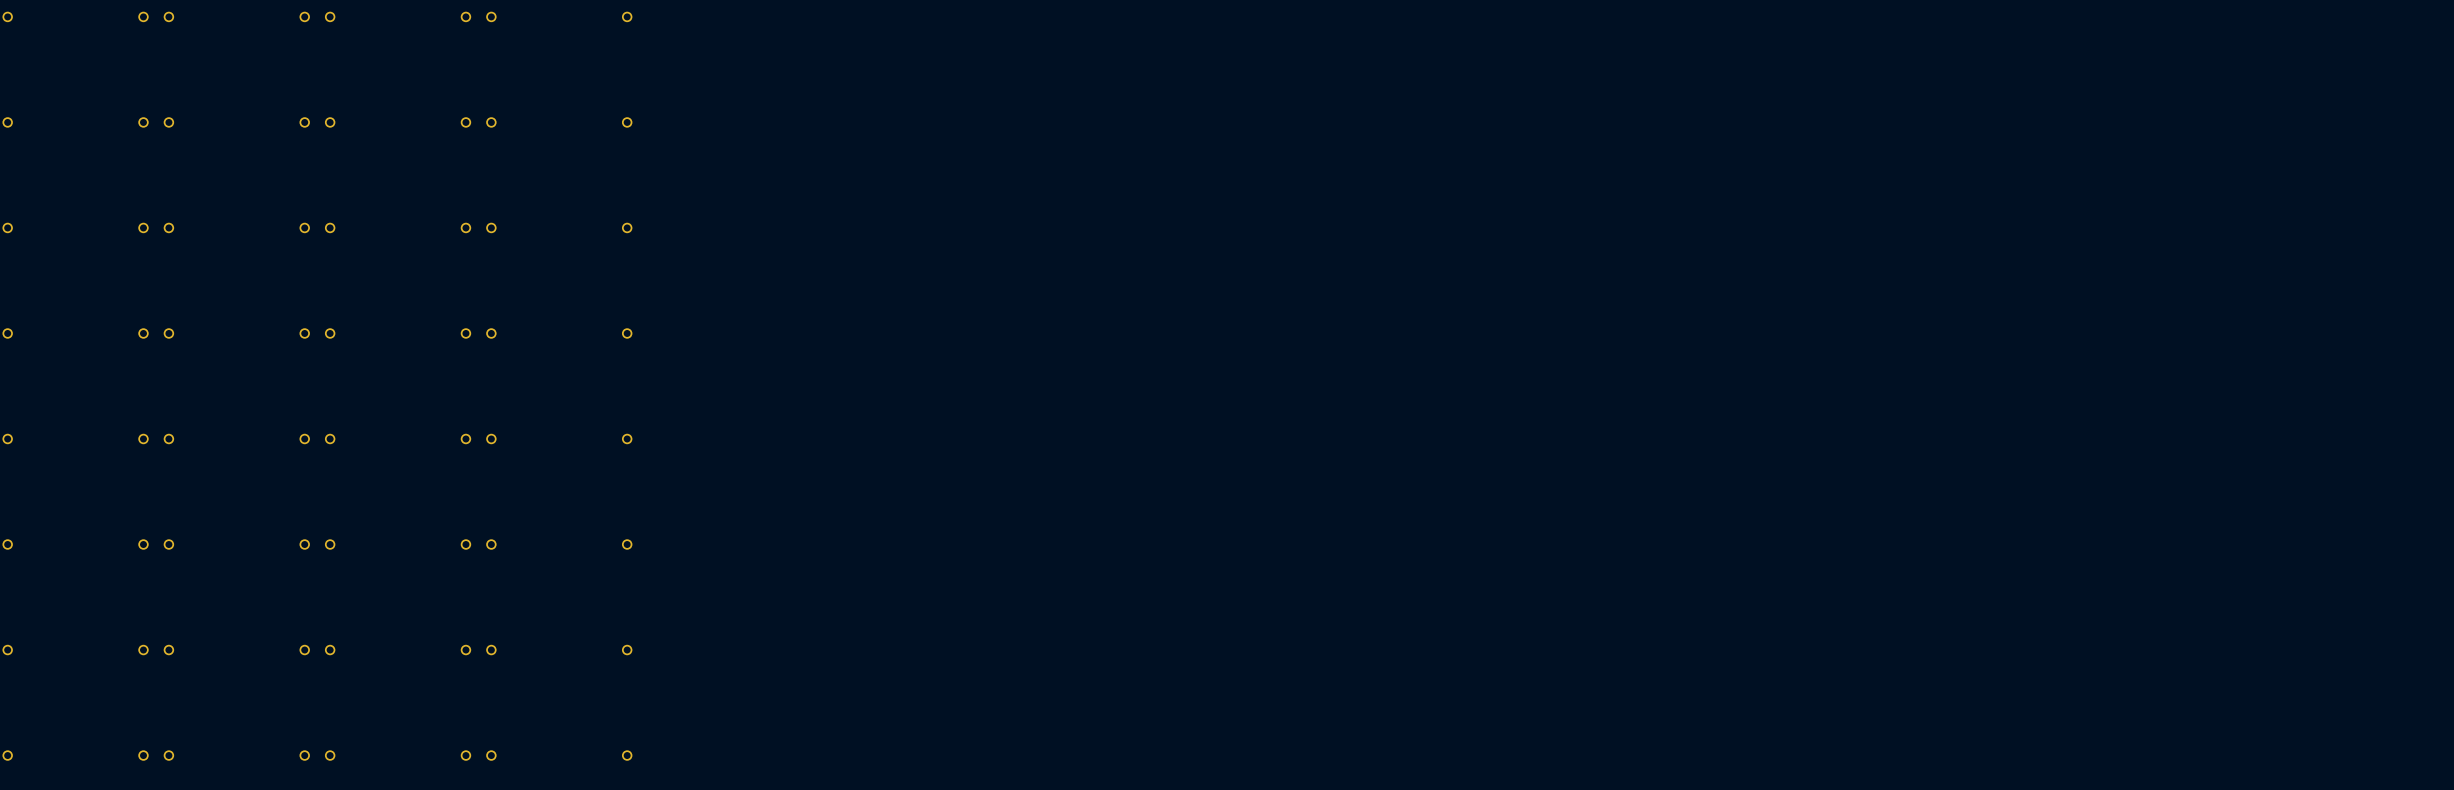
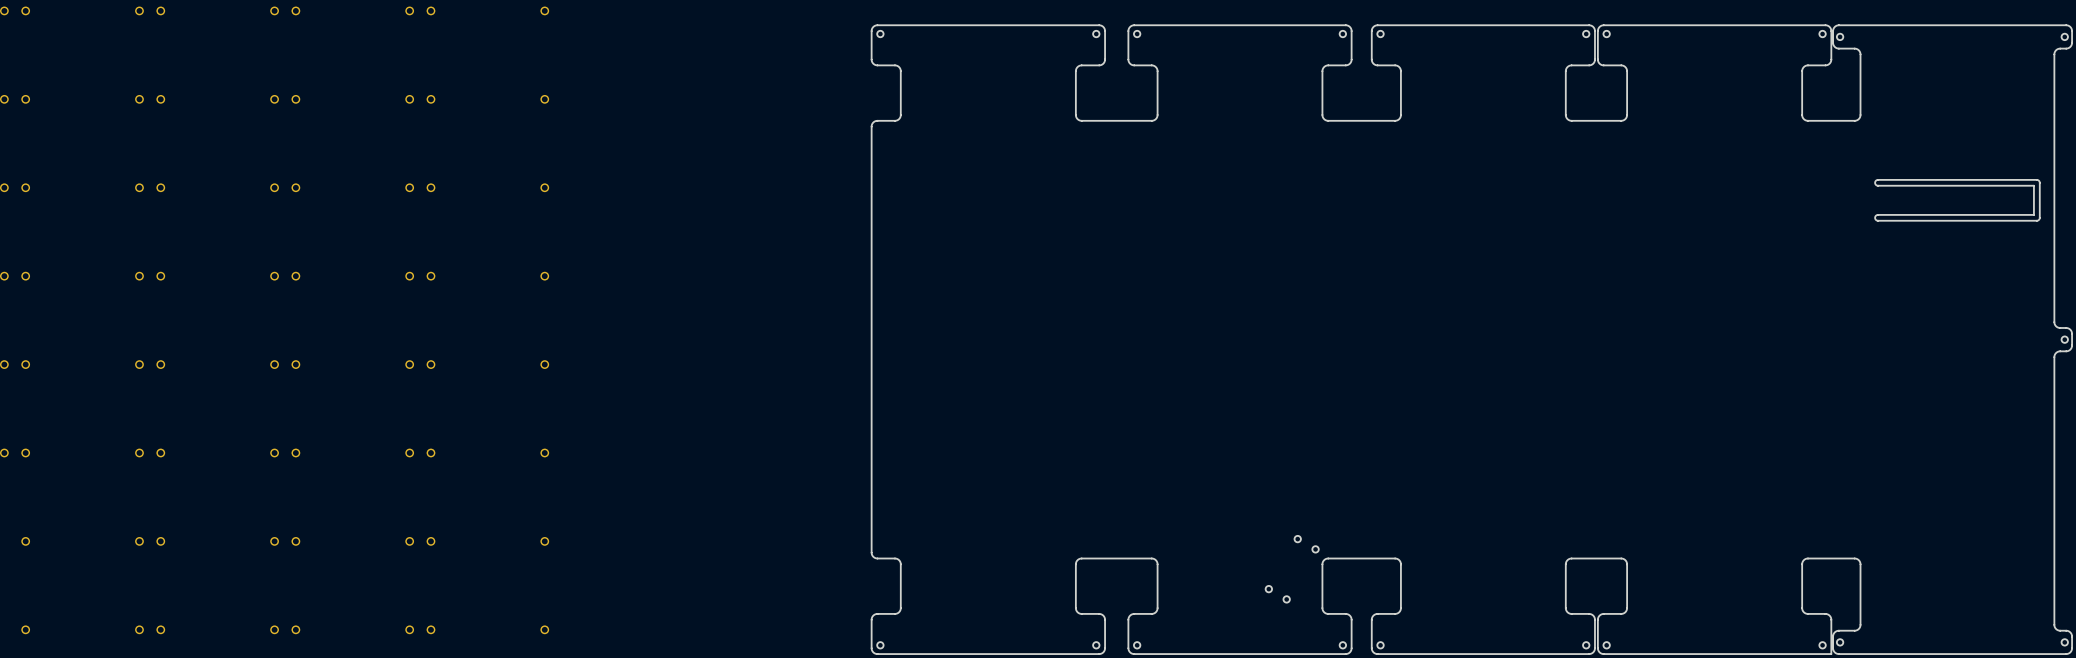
board edge: none -> (2066, 25) (1836, 25) (1833, 30) (1834, 46) (1855, 48) (1860, 53) (1860, 115) (1854, 120) (1807, 120) (1802, 116) (1802, 68) (1807, 65) (1827, 65) (1831, 61) (1831, 30) (1826, 25) (1601, 25) (1597, 30) (1598, 62) (1602, 65) (1622, 65) (1626, 69) (1627, 115) (1621, 120) (1570, 120) (1566, 116) (1566, 68) (1570, 65) (1590, 65) (1594, 61) (1594, 30) (1589, 25) (1375, 25) (1371, 30) (1372, 62) (1376, 65) (1396, 65) (1400, 69) (1400, 115) (1395, 120) (1328, 120) (1323, 117) (1323, 68) (1327, 65) (1347, 65) (1351, 61) (1351, 30) (1347, 25) (1131, 25) (1128, 30) (1129, 62) (1133, 65) (1153, 65) (1157, 69) (1157, 115) (1151, 120) (1081, 120) (1076, 117) (1076, 69) (1080, 65) (1099, 65) (1104, 62) (1105, 30) (1101, 25) (874, 25) (871, 30) (871, 61) (875, 65) (895, 65) (900, 68) (900, 114) (897, 120) (876, 120) (871, 126) (871, 552) (875, 558) (895, 558) (900, 561) (900, 608) (896, 613) (876, 613) (872, 616) (872, 651) (877, 654) (1100, 653) (1105, 648) (1104, 618) (1100, 614) (1080, 613) (1076, 611) (1076, 561) (1081, 558) (1151, 558) (1157, 563) (1157, 609) (1153, 613) (1133, 613) (1129, 616) (1128, 648) (1132, 653) (1346, 654) (1351, 648) (1351, 618) (1347, 614) (1327, 613) (1323, 611) (1323, 561) (1328, 558) (1395, 558) (1400, 563) (1400, 609) (1396, 613) (1376, 613) (1372, 616) (1371, 648) (1375, 653) (1589, 654) (1594, 648) (1594, 618) (1590, 614) (1570, 613) (1566, 611) (1566, 562) (1570, 558) (1621, 558) (1627, 563) (1626, 609) (1622, 613) (1603, 613) (1598, 616) (1597, 648) (1601, 653) (1831, 654) (1830, 616) (1826, 613) (1806, 613) (1802, 609) (1802, 563) (1807, 558) (1854, 558) (1860, 563) (1860, 625) (1856, 630) (1838, 630) (1834, 632) (1833, 648) (1836, 653) (2069, 653) (2072, 648) (2071, 634) (2067, 630) (2057, 630) (2054, 624) (2054, 357) (2057, 351) (2069, 350) (2072, 345) (2070, 330) (2057, 327) (2054, 322) (2054, 54) (2057, 49) (2067, 48) (2071, 45) (2071, 29) (2066, 25)
round board edge: none -> [876, 30, 884, 38]
round board edge: none -> [1092, 30, 1100, 38]
round board edge: none -> [1133, 30, 1141, 38]
round board edge: none -> [1339, 30, 1347, 38]
round board edge: none -> [1377, 30, 1385, 38]
round board edge: none -> [1582, 30, 1590, 38]
round board edge: none -> [1603, 30, 1611, 38]
round board edge: none -> [1819, 30, 1827, 38]
round board edge: none -> [1836, 33, 1844, 41]
round board edge: none -> [2061, 33, 2069, 41]
board edge: none -> (2036, 179) (1877, 179) (1875, 183) (1878, 185) (2033, 185) (2033, 214) (1878, 214) (1875, 218) (1878, 220) (2037, 220) (2039, 218) (2039, 182) (2036, 179)
round board edge: none -> [2061, 336, 2069, 344]
round board edge: none -> [1294, 535, 1302, 543]
round board edge: none -> [1312, 545, 1320, 553]
round board edge: none -> [1265, 585, 1273, 593]
round board edge: none -> [1283, 595, 1291, 603]
round board edge: none -> [1836, 638, 1844, 646]
round board edge: none -> [2061, 638, 2069, 646]
round board edge: none -> [876, 641, 884, 649]
round board edge: none -> [1092, 641, 1100, 649]
round board edge: none -> [1133, 641, 1141, 649]
round board edge: none -> [1339, 641, 1347, 649]
round board edge: none -> [1377, 641, 1385, 649]
round board edge: none -> [1582, 641, 1590, 649]
round board edge: none -> [1603, 641, 1611, 649]
round board edge: none -> [1819, 641, 1827, 649]

